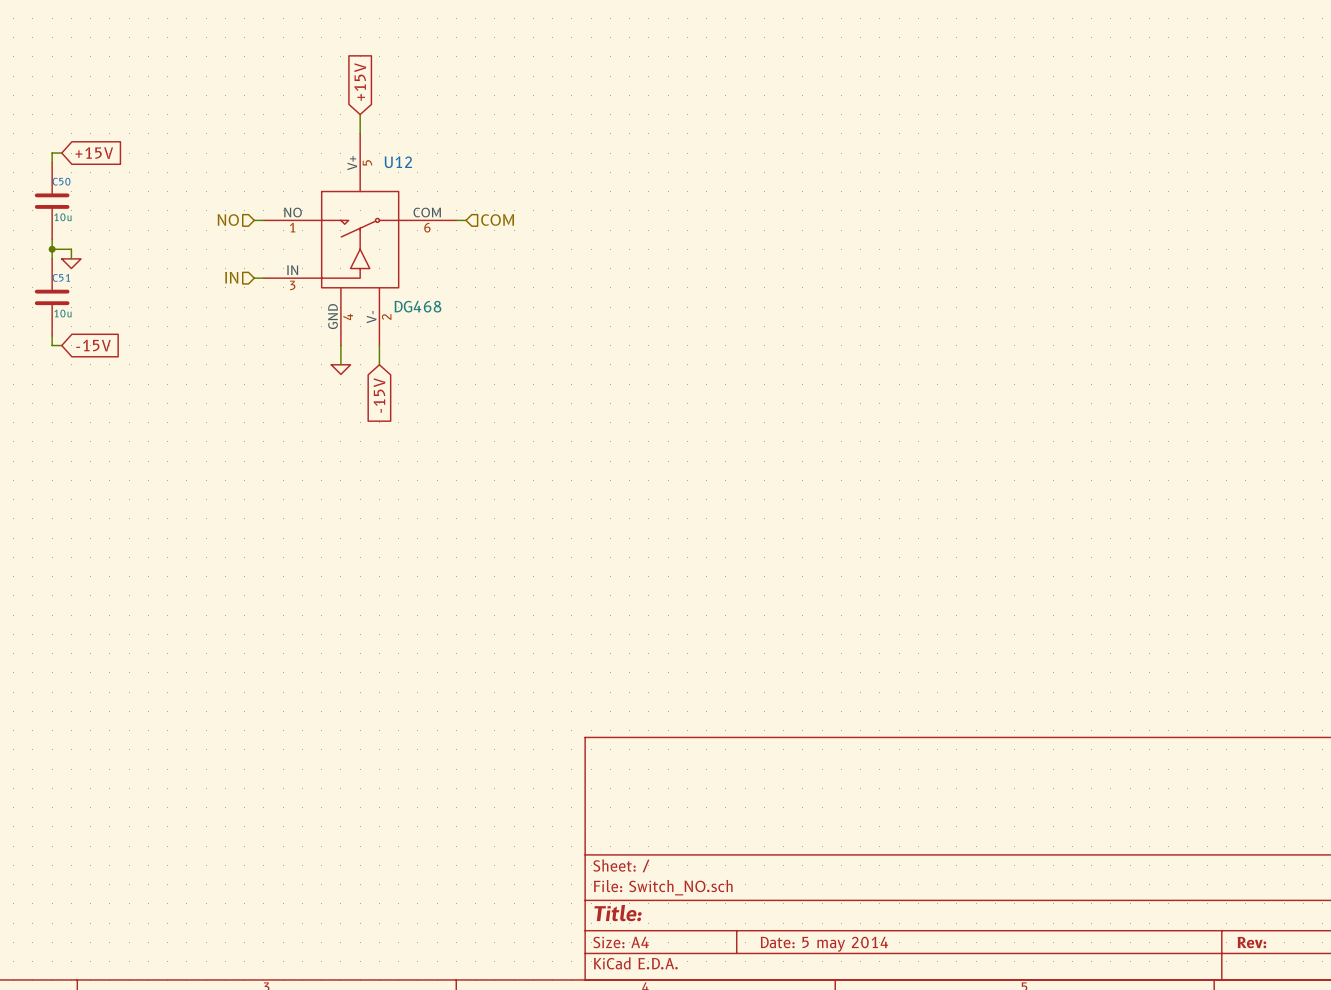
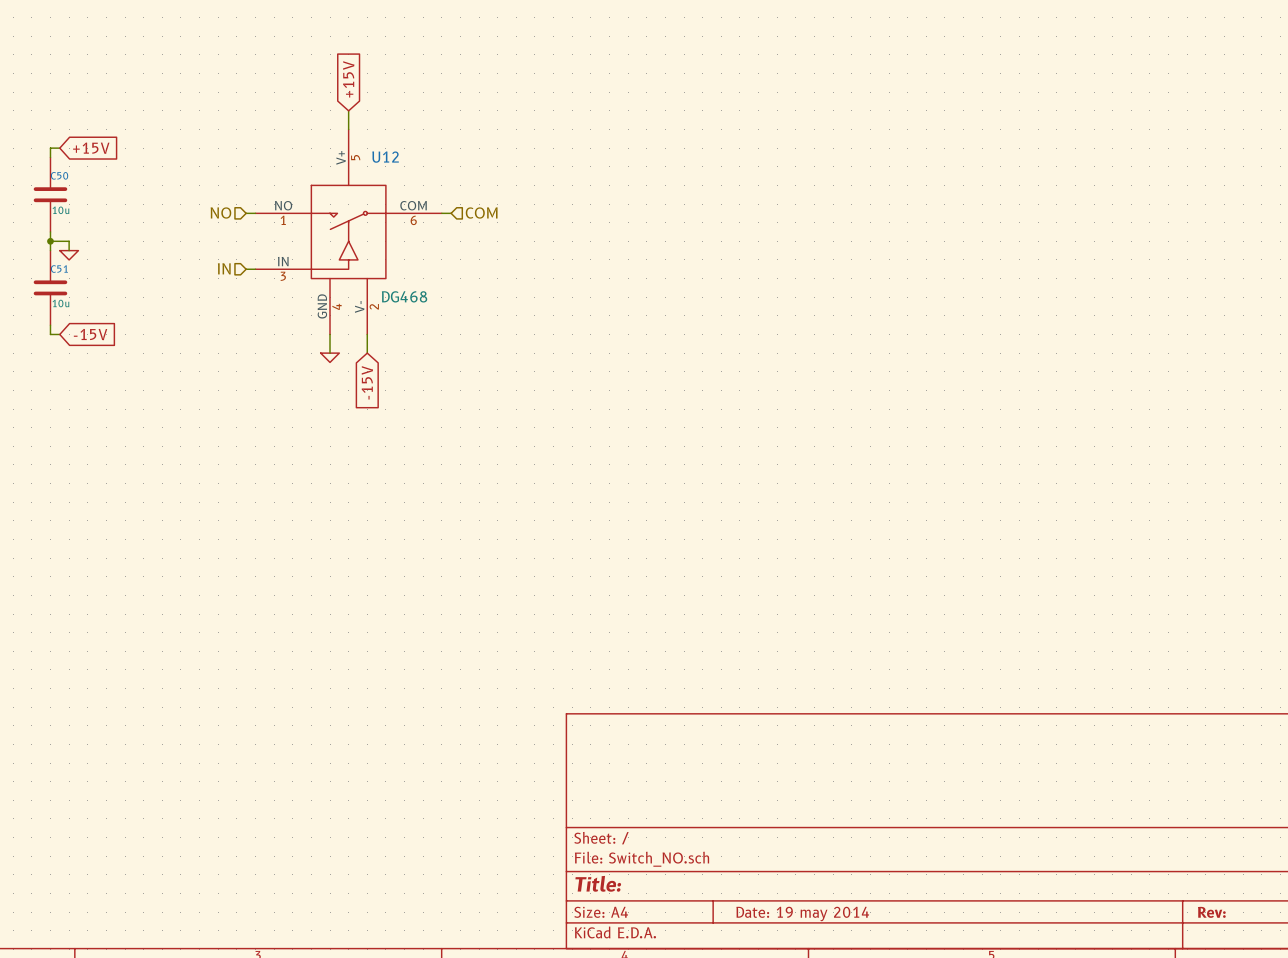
title block: Date: 5 may 2014 (824, 944) -> Date: 19 may 2014 (802, 913)

